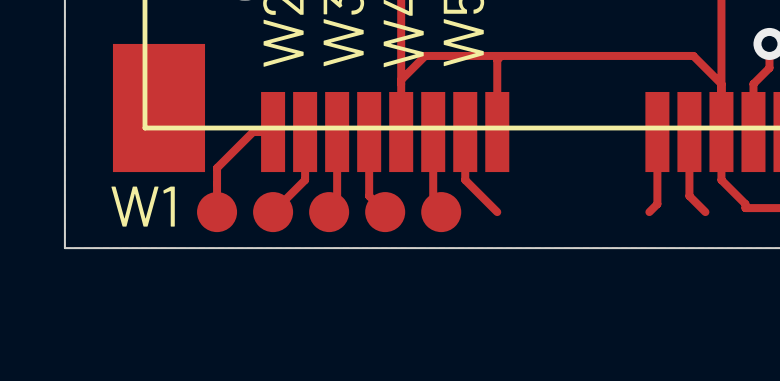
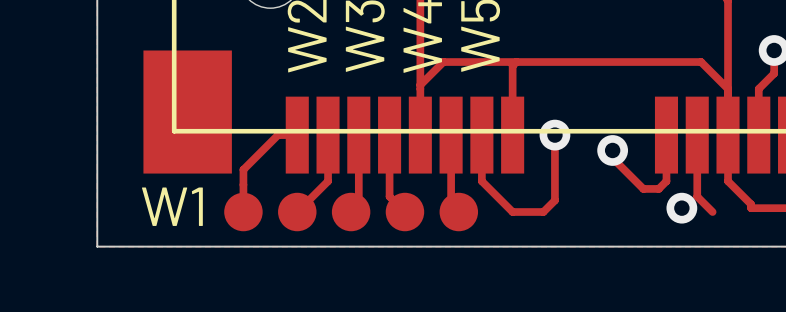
track: none -> (554, 135) (554, 200) (543, 212) (512, 212)
via: none -> (554, 135)
via: none -> (612, 150)
track: (657, 180) (657, 204) (649, 212) -> (666, 181) (658, 188) (643, 188) (612, 158) (612, 150)
via: none -> (681, 208)

